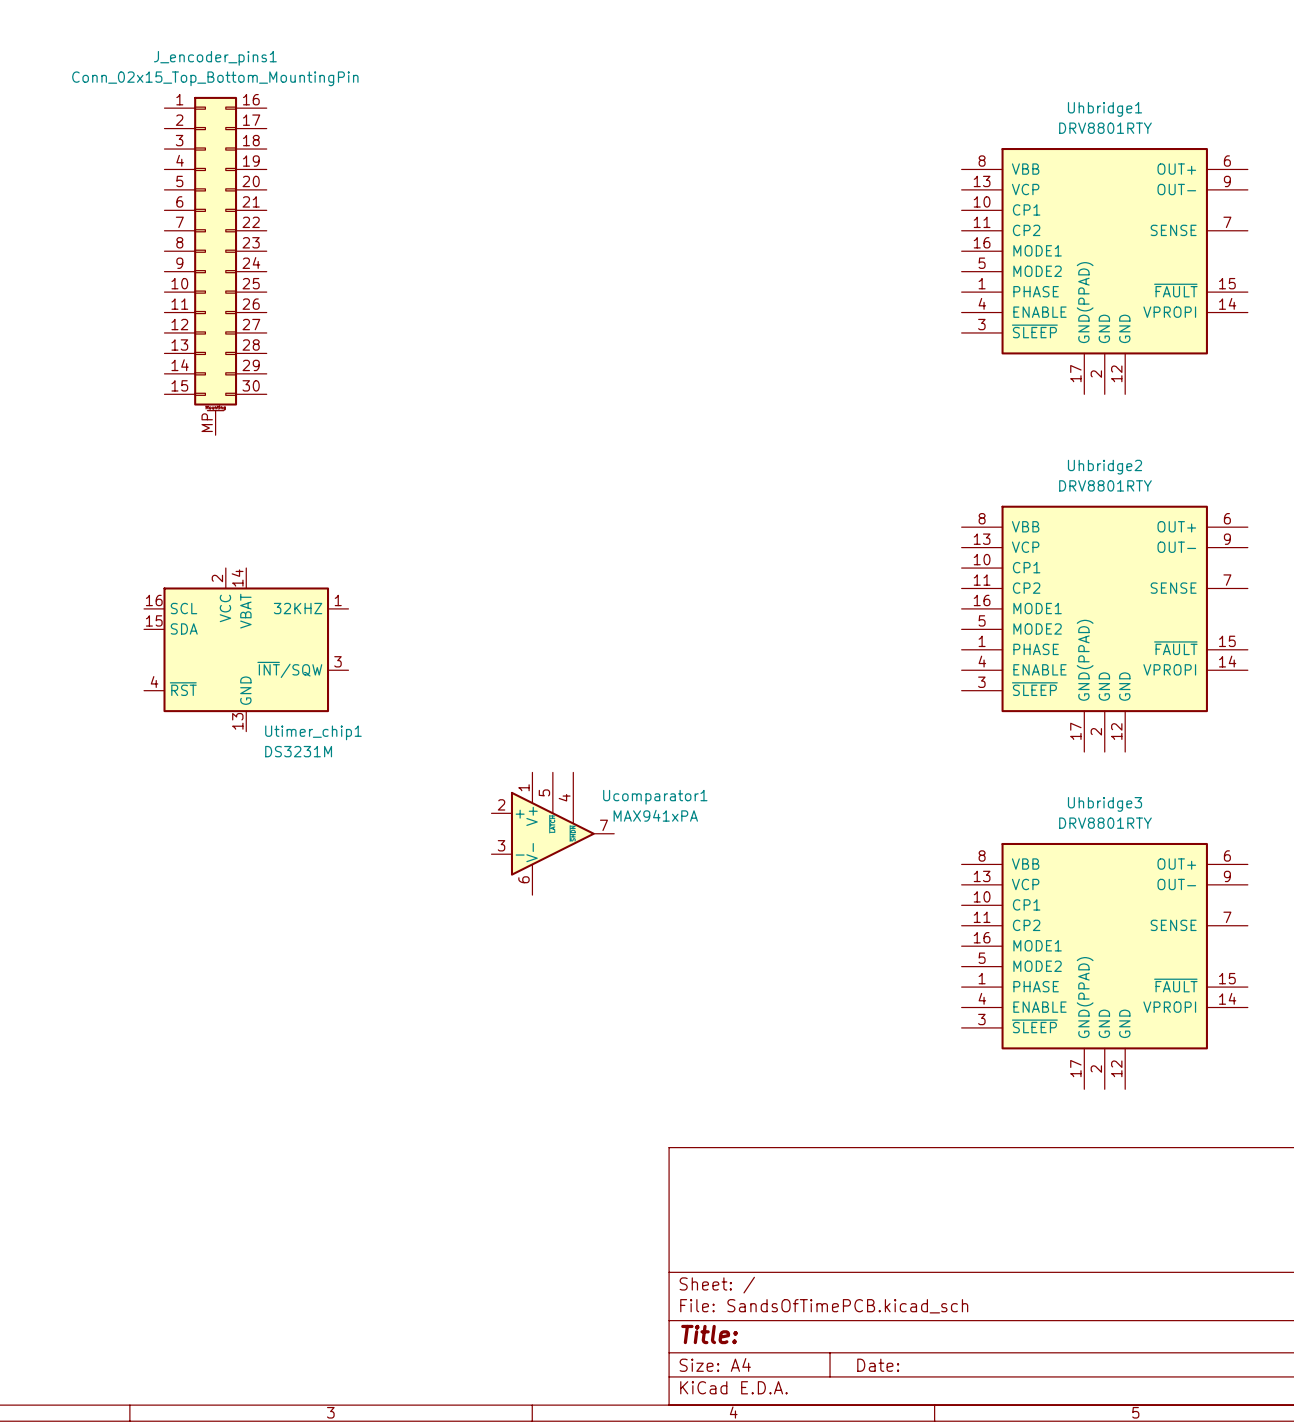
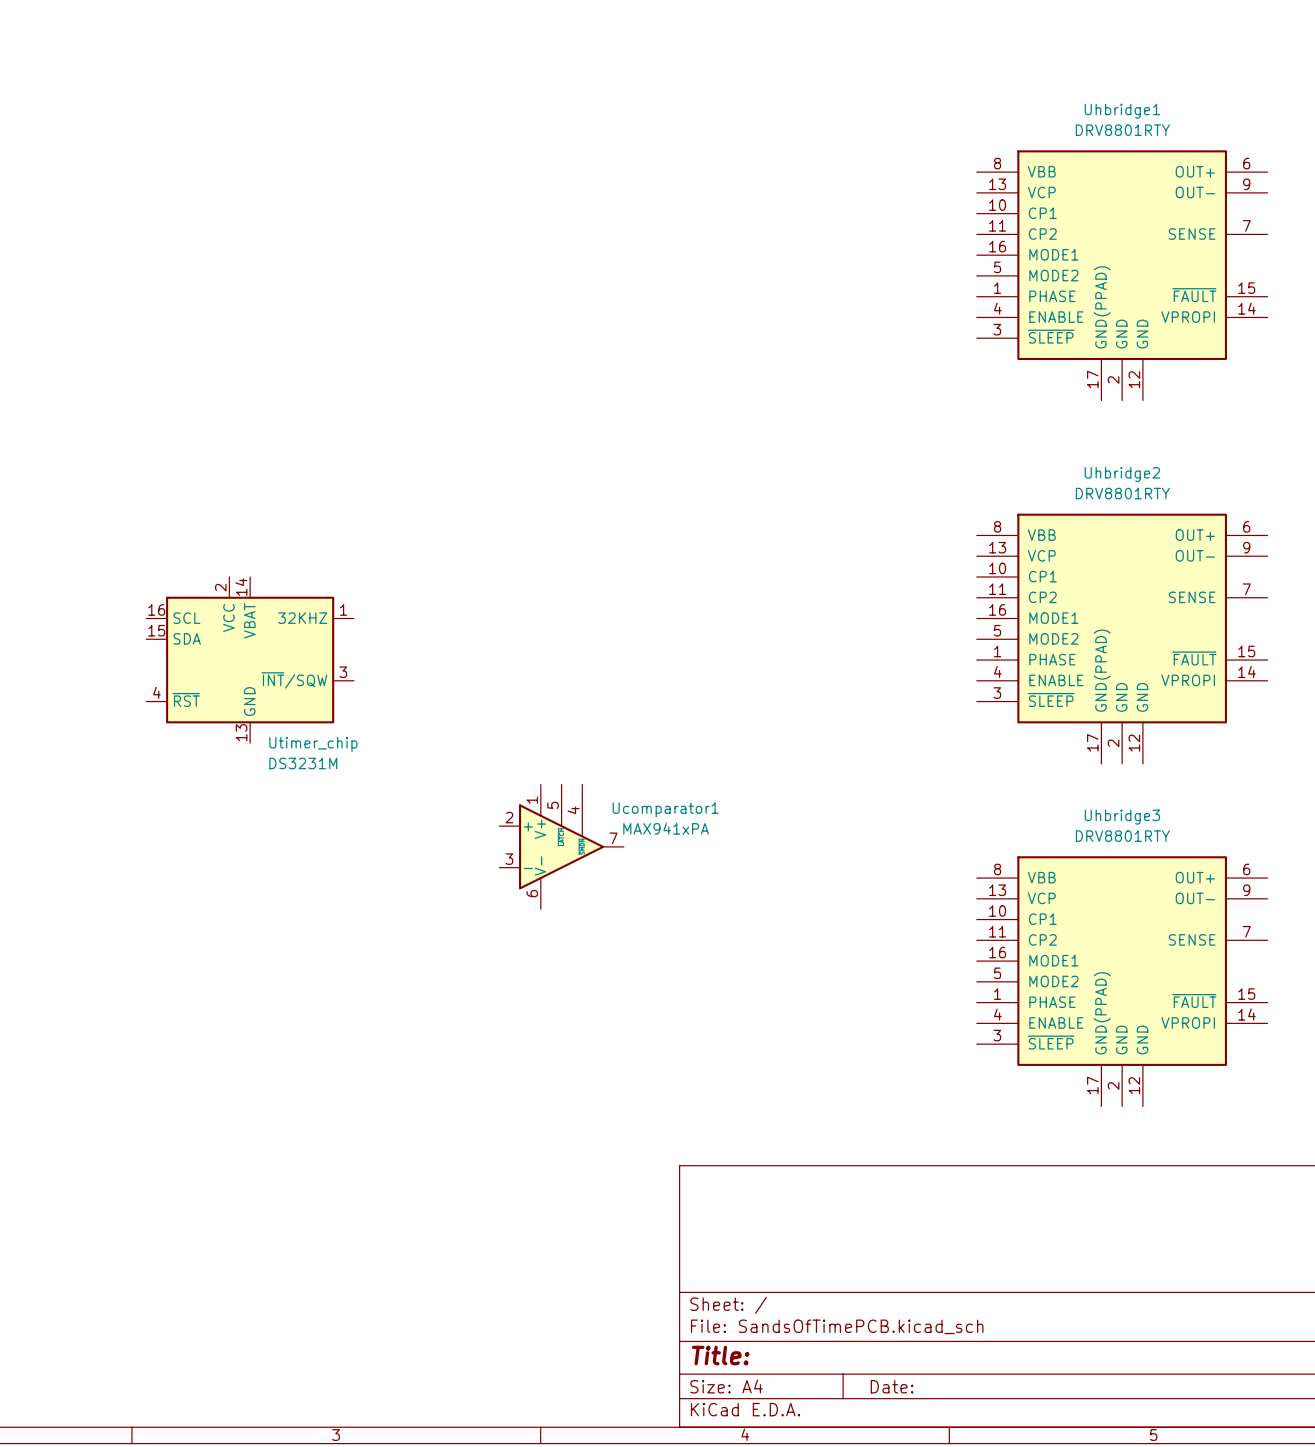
J_encoder_pins1: Conn_02x15_Top_Bottom_MountingPin (215, 266) -> none
Utimer_chip1 name: Utimer_chip1 (313, 732) -> Utimer_chip (313, 744)

